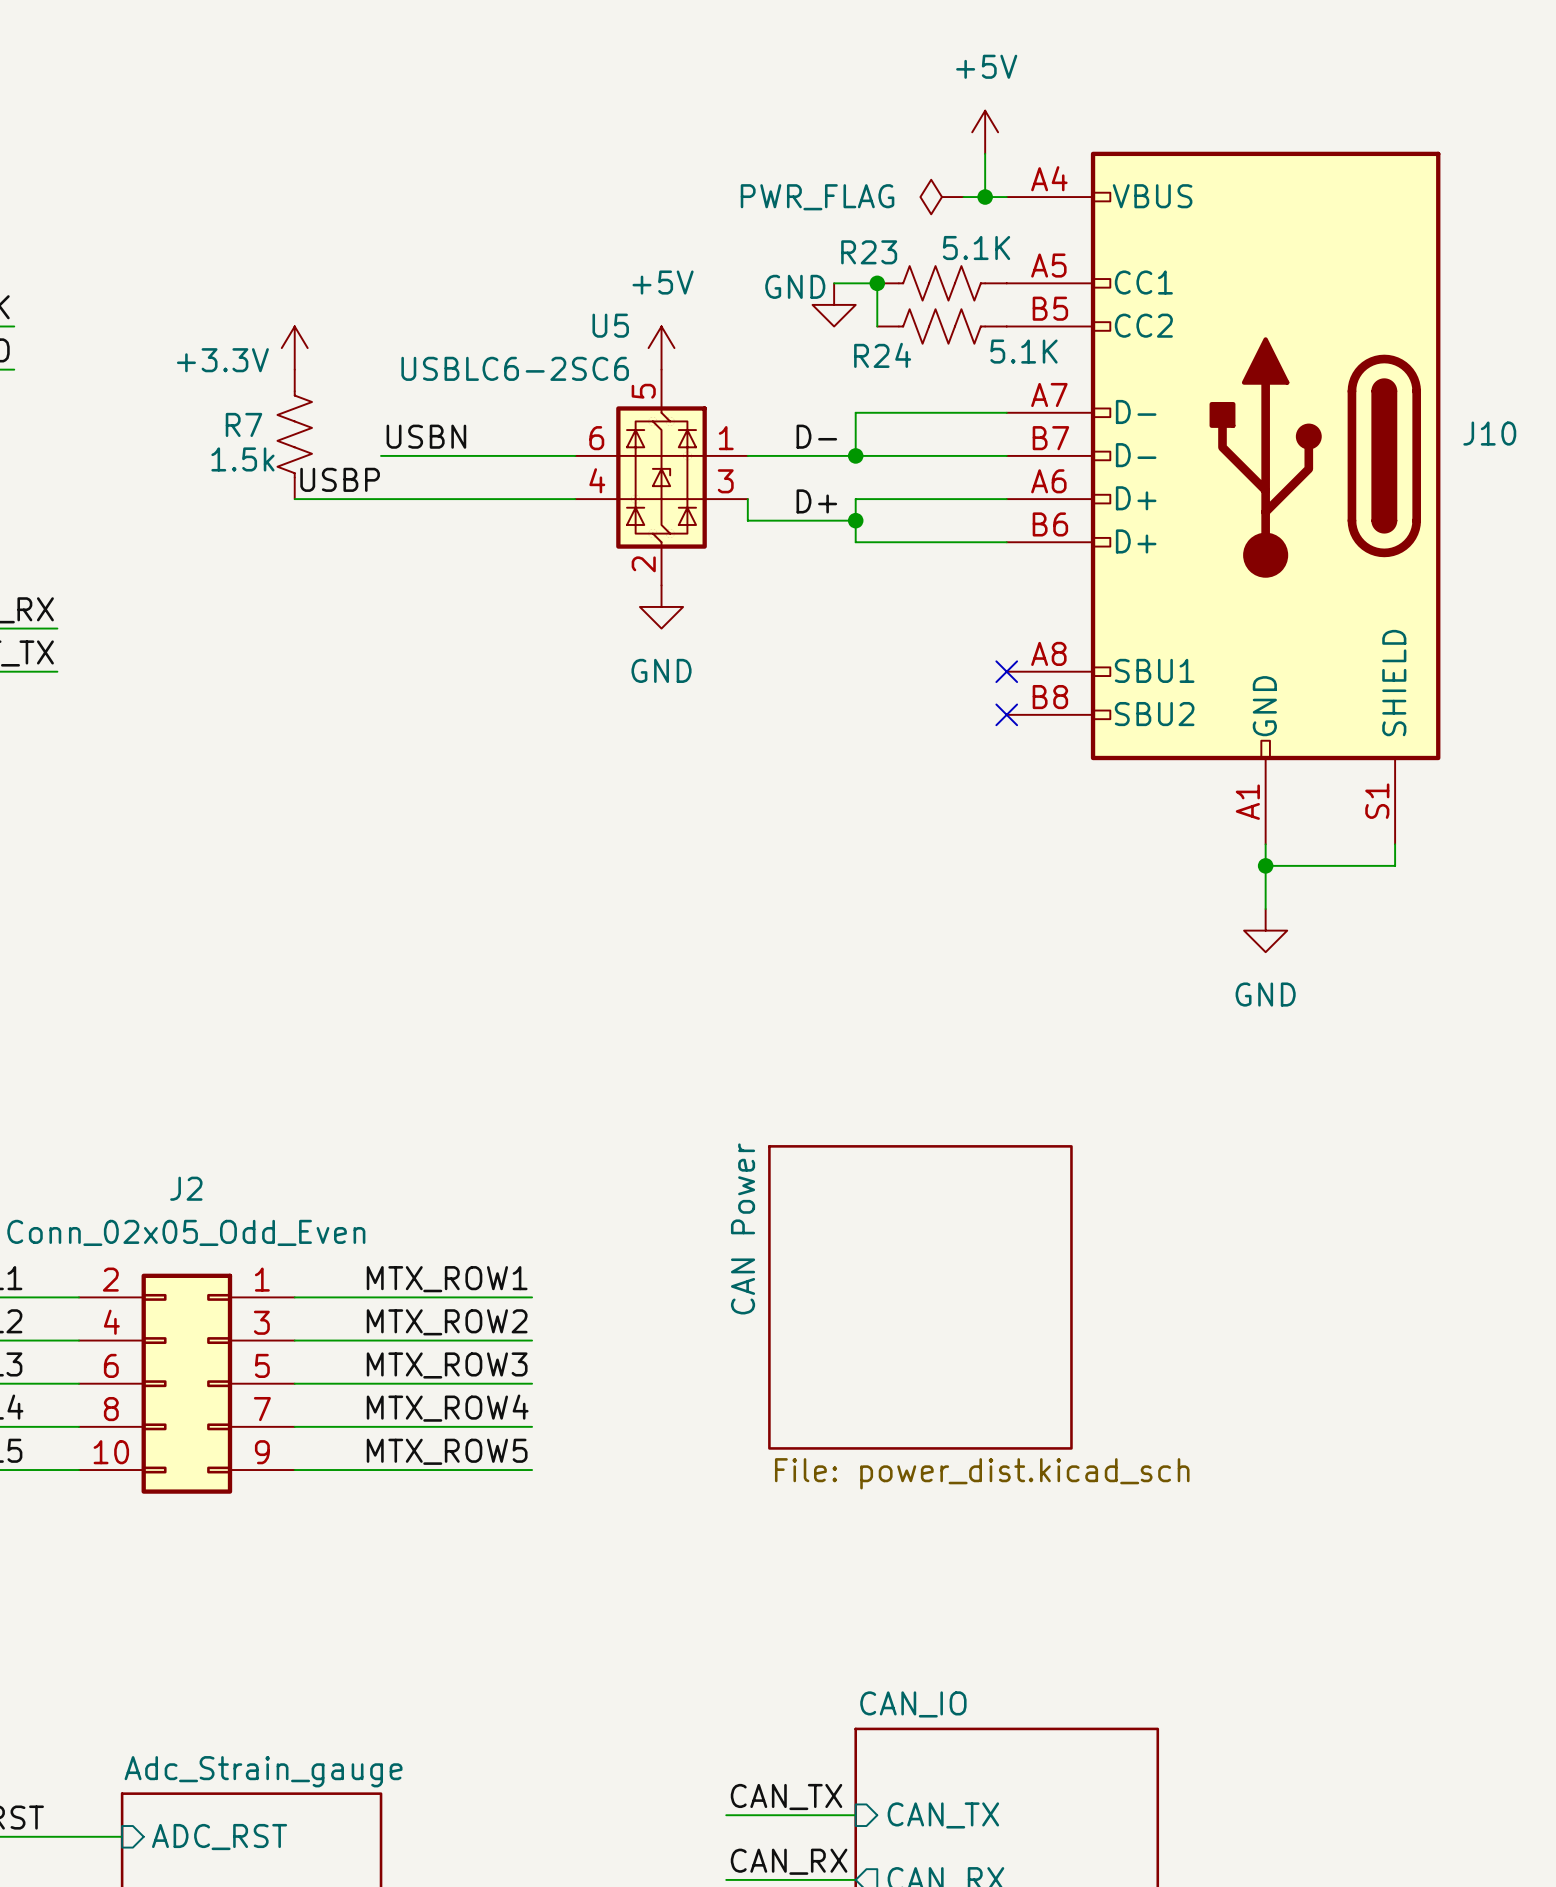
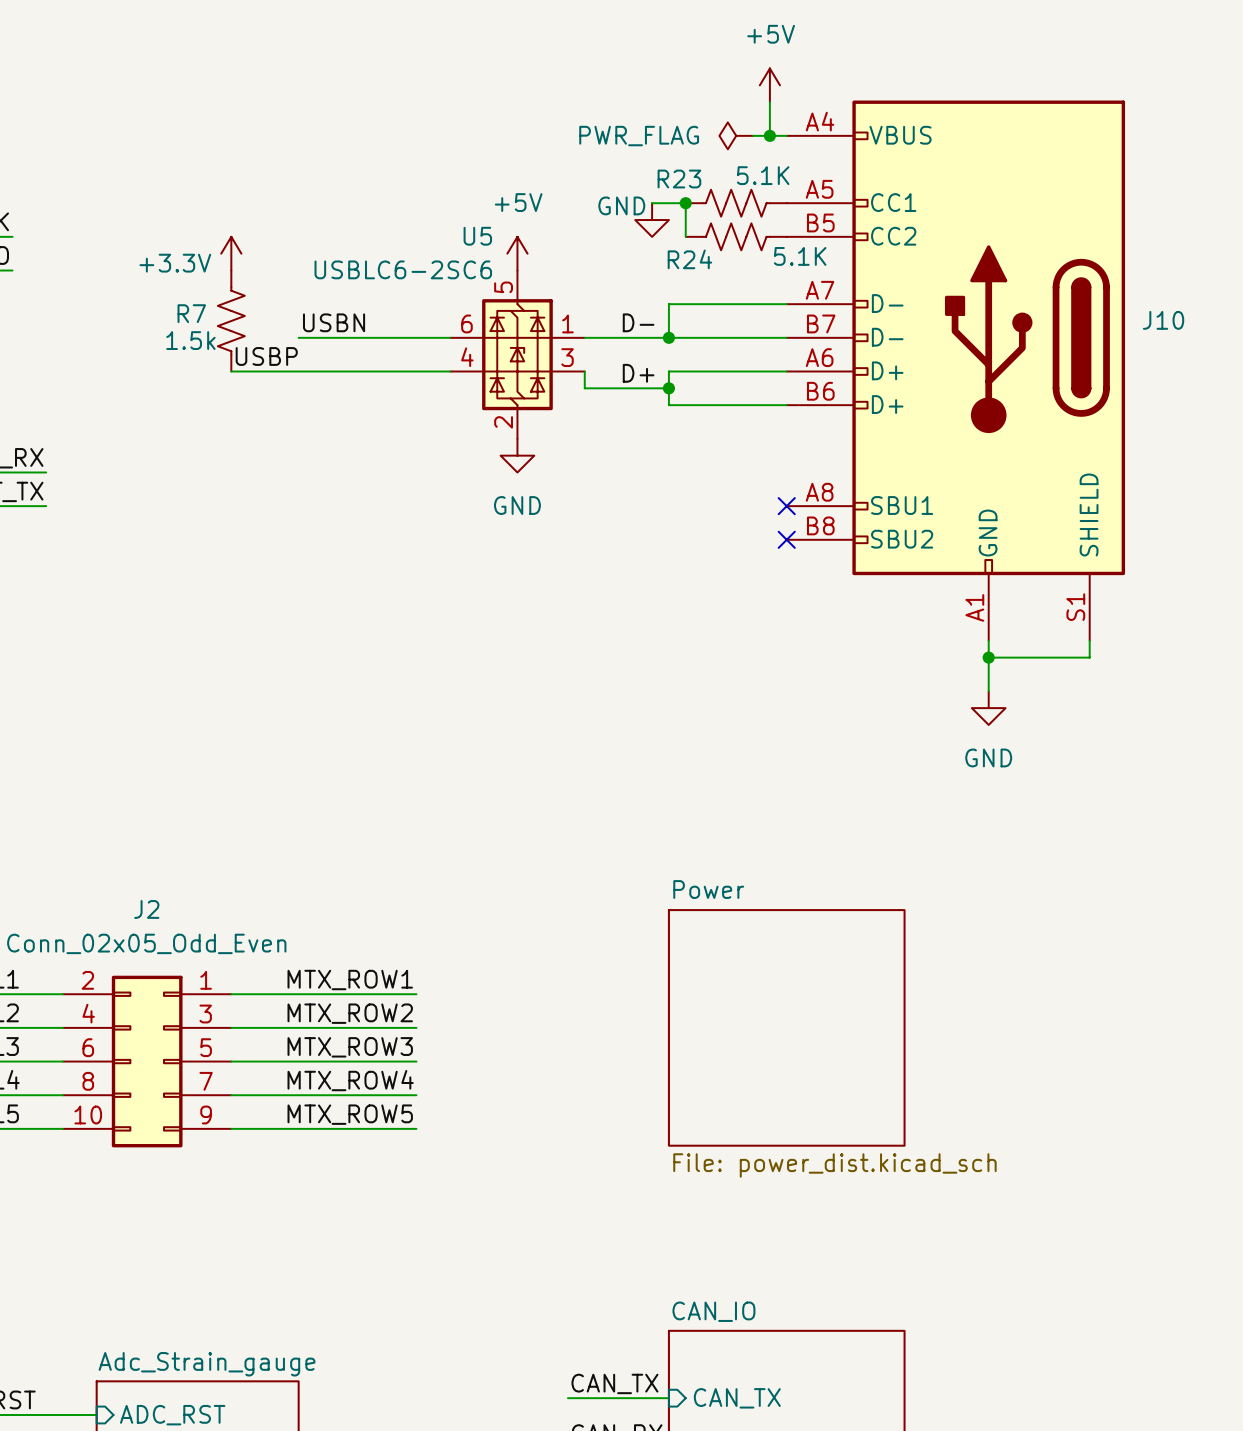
sheet CAN Power: File: power_dist.kicad_sch (920, 1297) -> none
sheet Power: none -> File: power_dist.kicad_sch (786, 1027)

